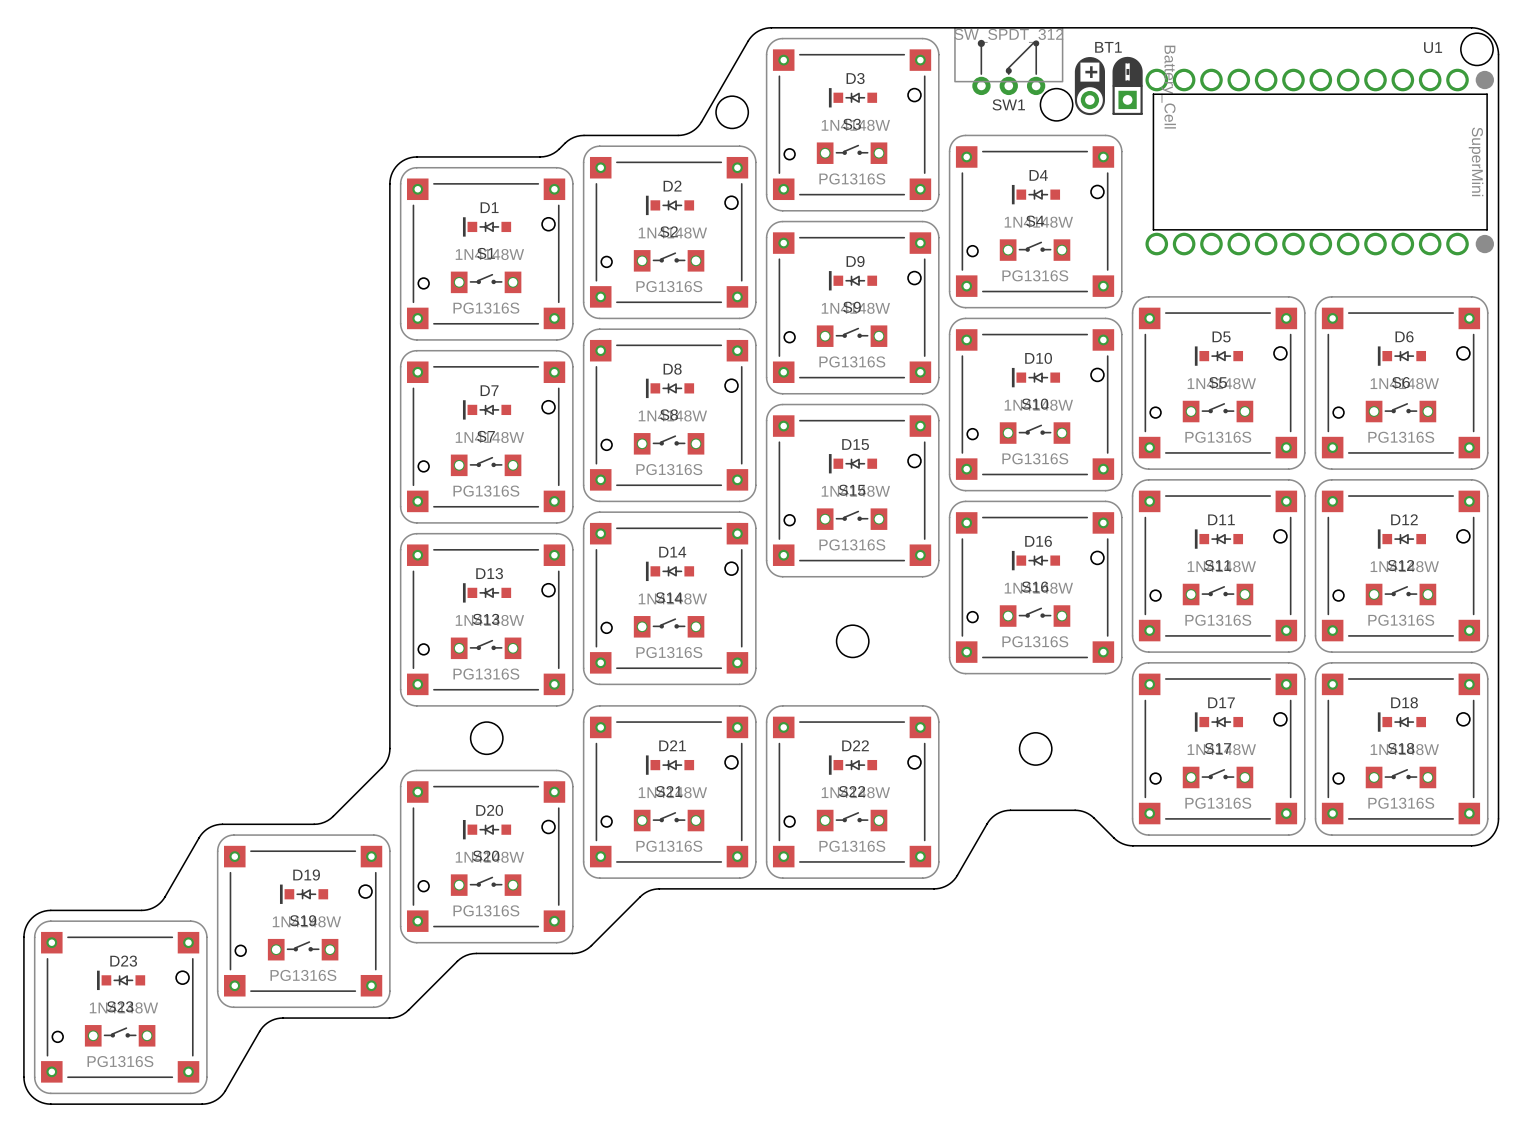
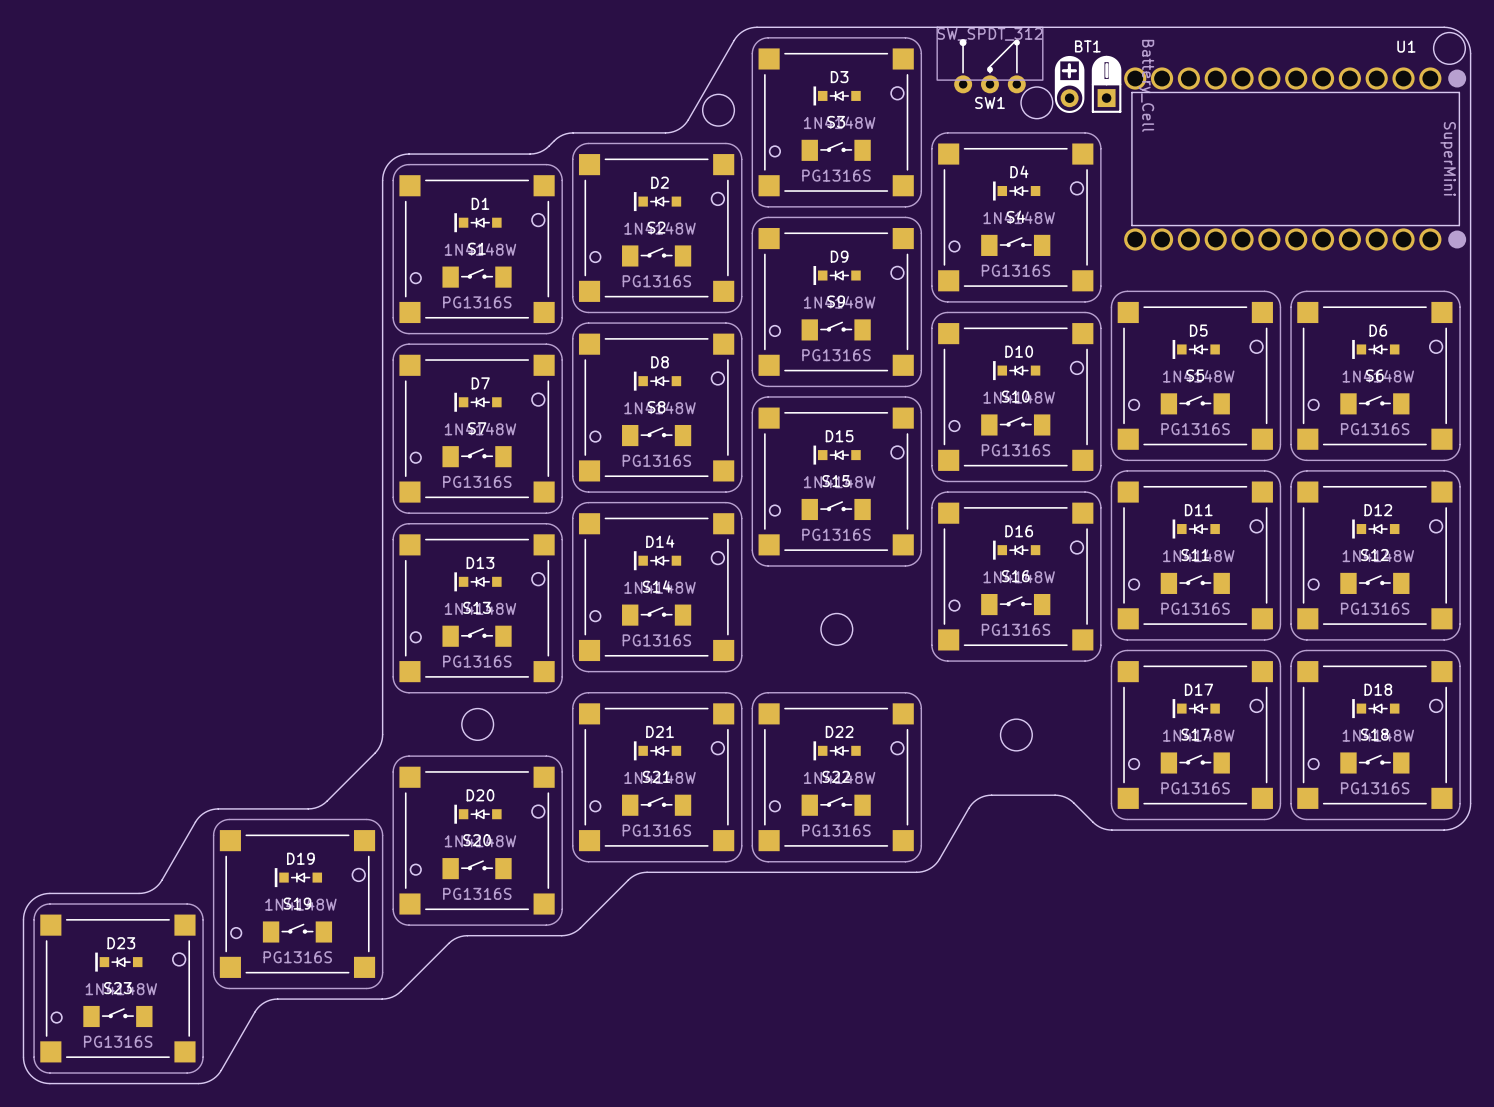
S3 footprint: [766, 38, 940, 212] -> [751, 37, 922, 208]
S4 footprint: [949, 134, 1123, 309] -> [931, 132, 1102, 303]
S2 footprint: [583, 145, 757, 319] -> [572, 142, 743, 314]
S1 footprint: [400, 167, 574, 341] -> [392, 164, 563, 335]
S9 footprint: [766, 221, 940, 395] -> [751, 216, 922, 387]
S5 footprint: [1132, 296, 1306, 470] -> [1110, 290, 1281, 461]
S6 footprint: [1314, 296, 1489, 470] -> [1290, 290, 1461, 461]
S10 footprint: [949, 317, 1123, 492] -> [931, 311, 1102, 483]
S8 footprint: [583, 328, 757, 502] -> [572, 322, 743, 493]
S7 footprint: [400, 350, 574, 524] -> [392, 343, 563, 514]
S15 footprint: [766, 403, 940, 578] -> [751, 396, 922, 567]
S11 footprint: [1132, 479, 1306, 653] -> [1110, 470, 1281, 641]
S12 footprint: [1314, 479, 1489, 653] -> [1290, 470, 1461, 641]
S16 footprint: [949, 500, 1123, 675] -> [931, 491, 1102, 662]
S14 footprint: [583, 511, 757, 685] -> [572, 502, 743, 673]
S13 footprint: [400, 533, 574, 707] -> [392, 523, 563, 694]
S17 footprint: [1132, 662, 1306, 836] -> [1110, 649, 1281, 821]
S18 footprint: [1314, 662, 1489, 836] -> [1290, 649, 1461, 821]
S21 footprint: [583, 705, 757, 879] -> [572, 692, 743, 863]
S22 footprint: [766, 705, 940, 879] -> [751, 692, 922, 863]
S20 footprint: [400, 769, 574, 944] -> [392, 755, 563, 926]
S19 footprint: [217, 834, 391, 1008] -> [213, 818, 384, 990]
S23 footprint: [34, 920, 208, 1094] -> [33, 903, 204, 1074]

